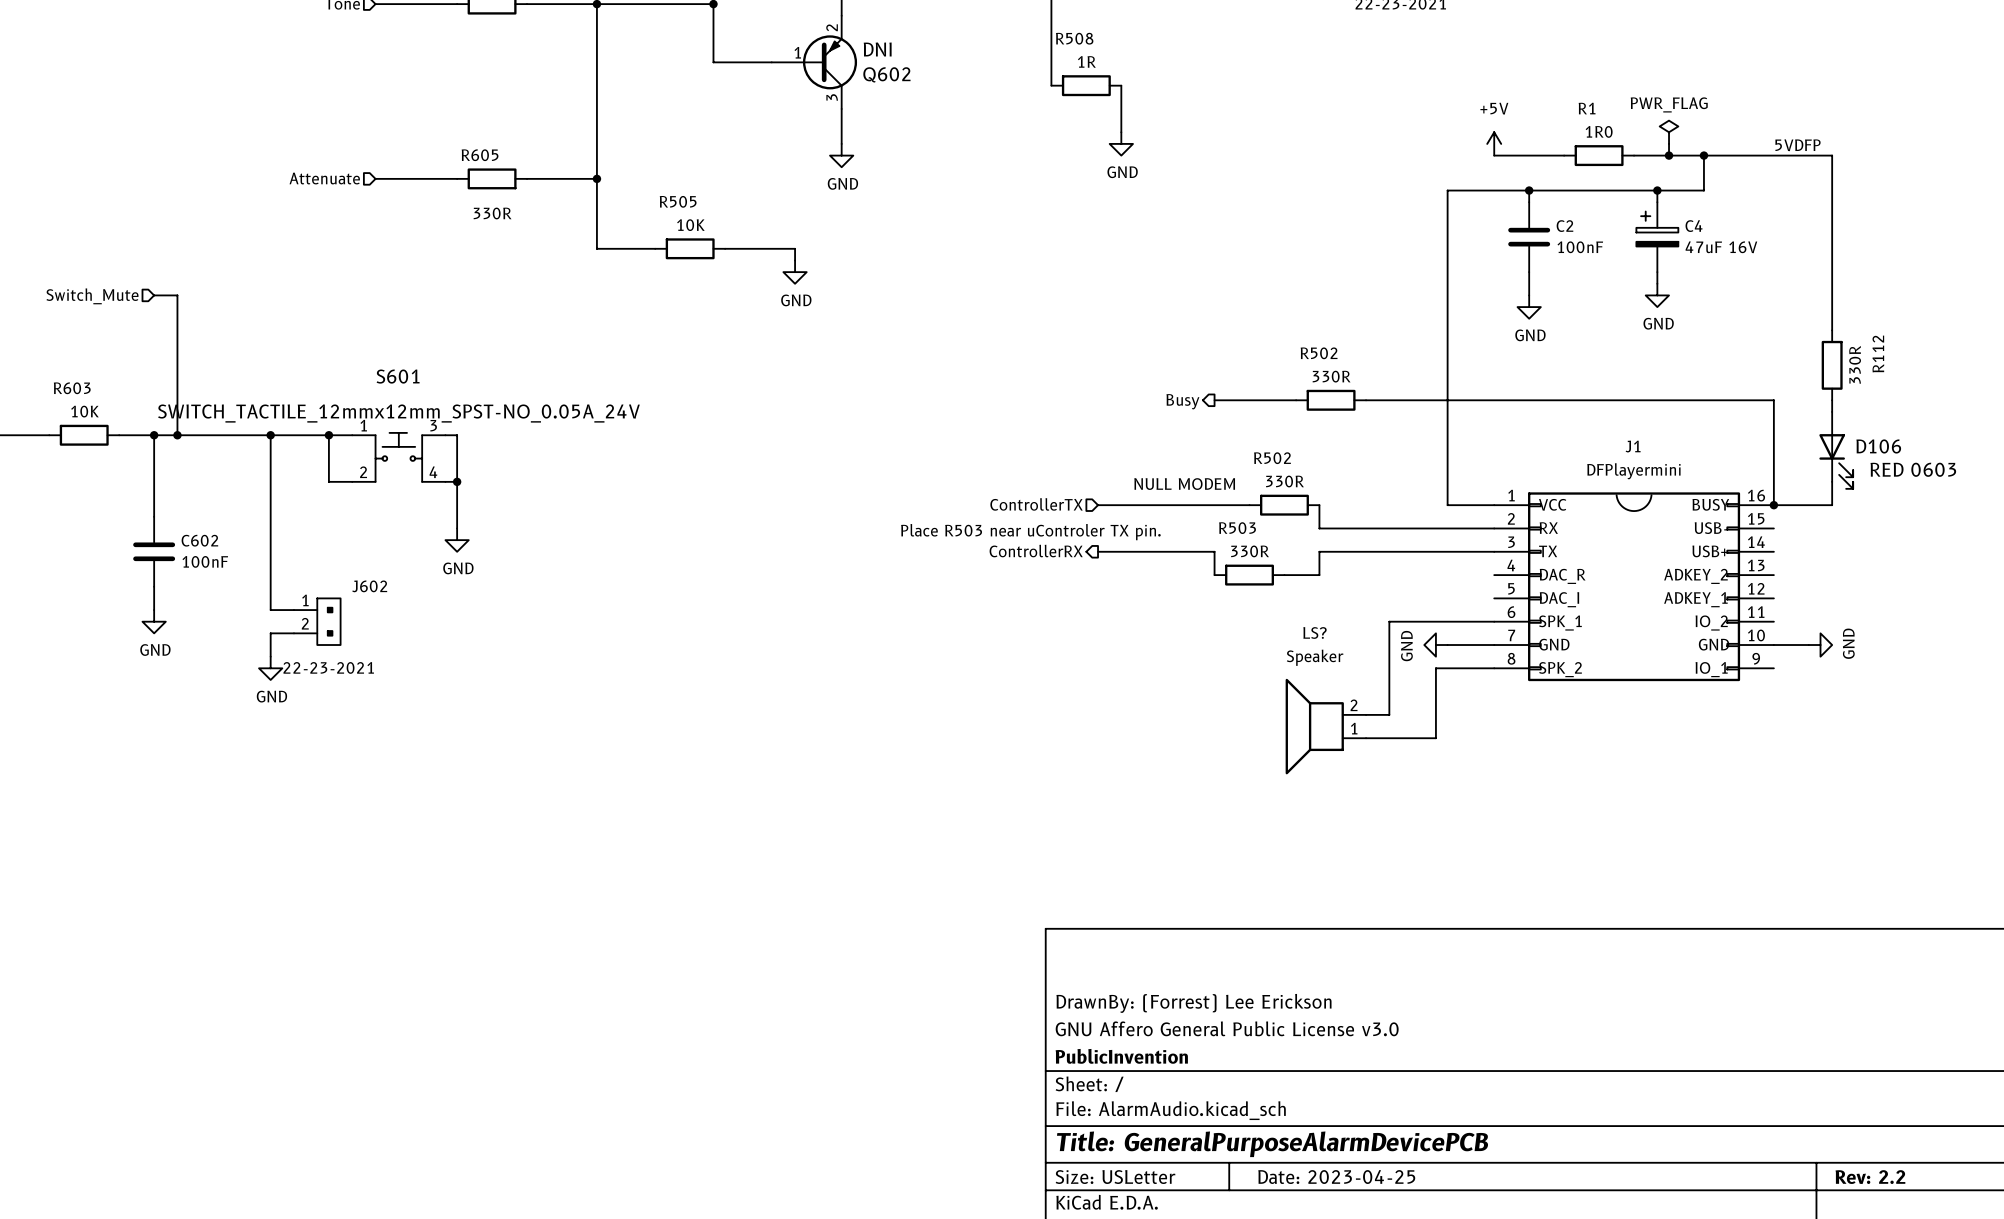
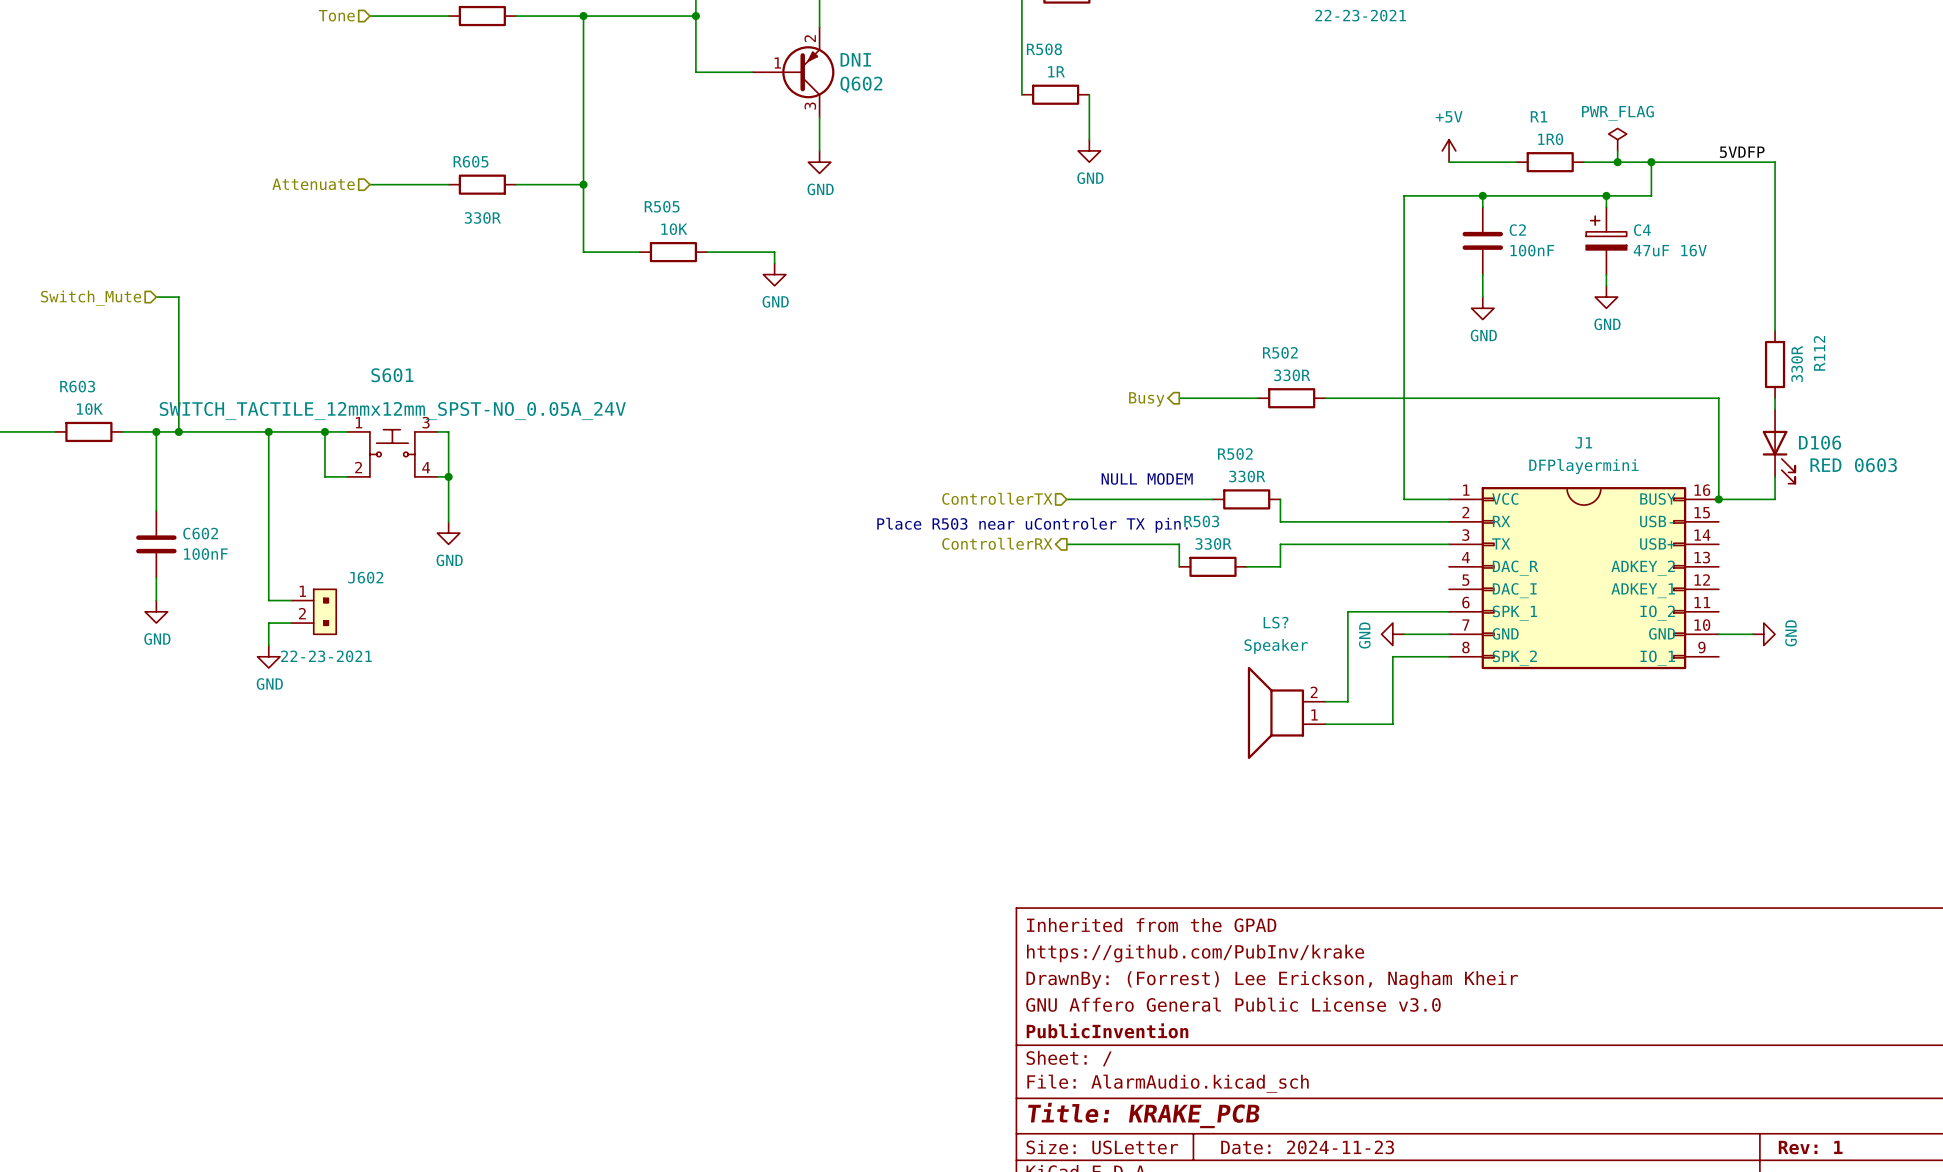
title block: none -> Inherited from the GPAD (1151, 925)
title block: none -> https://github.com/PubInv/krake (1195, 953)
title block: DrawnBy: (Forrest) Lee Erickson (1193, 1003) -> DrawnBy: (Forrest) Lee Erickson, Nagham Kheir (1272, 980)
title block: Title: GeneralPurposeAlarmDevicePCB (1272, 1144) -> Title: KRAKE_PCB (1143, 1115)
title block: Date: 2023-04-25 (1336, 1177) -> Date: 2024-11-23 (1307, 1147)
title block: Rev: 2.2 (1870, 1177) -> Rev: 1 (1810, 1147)

